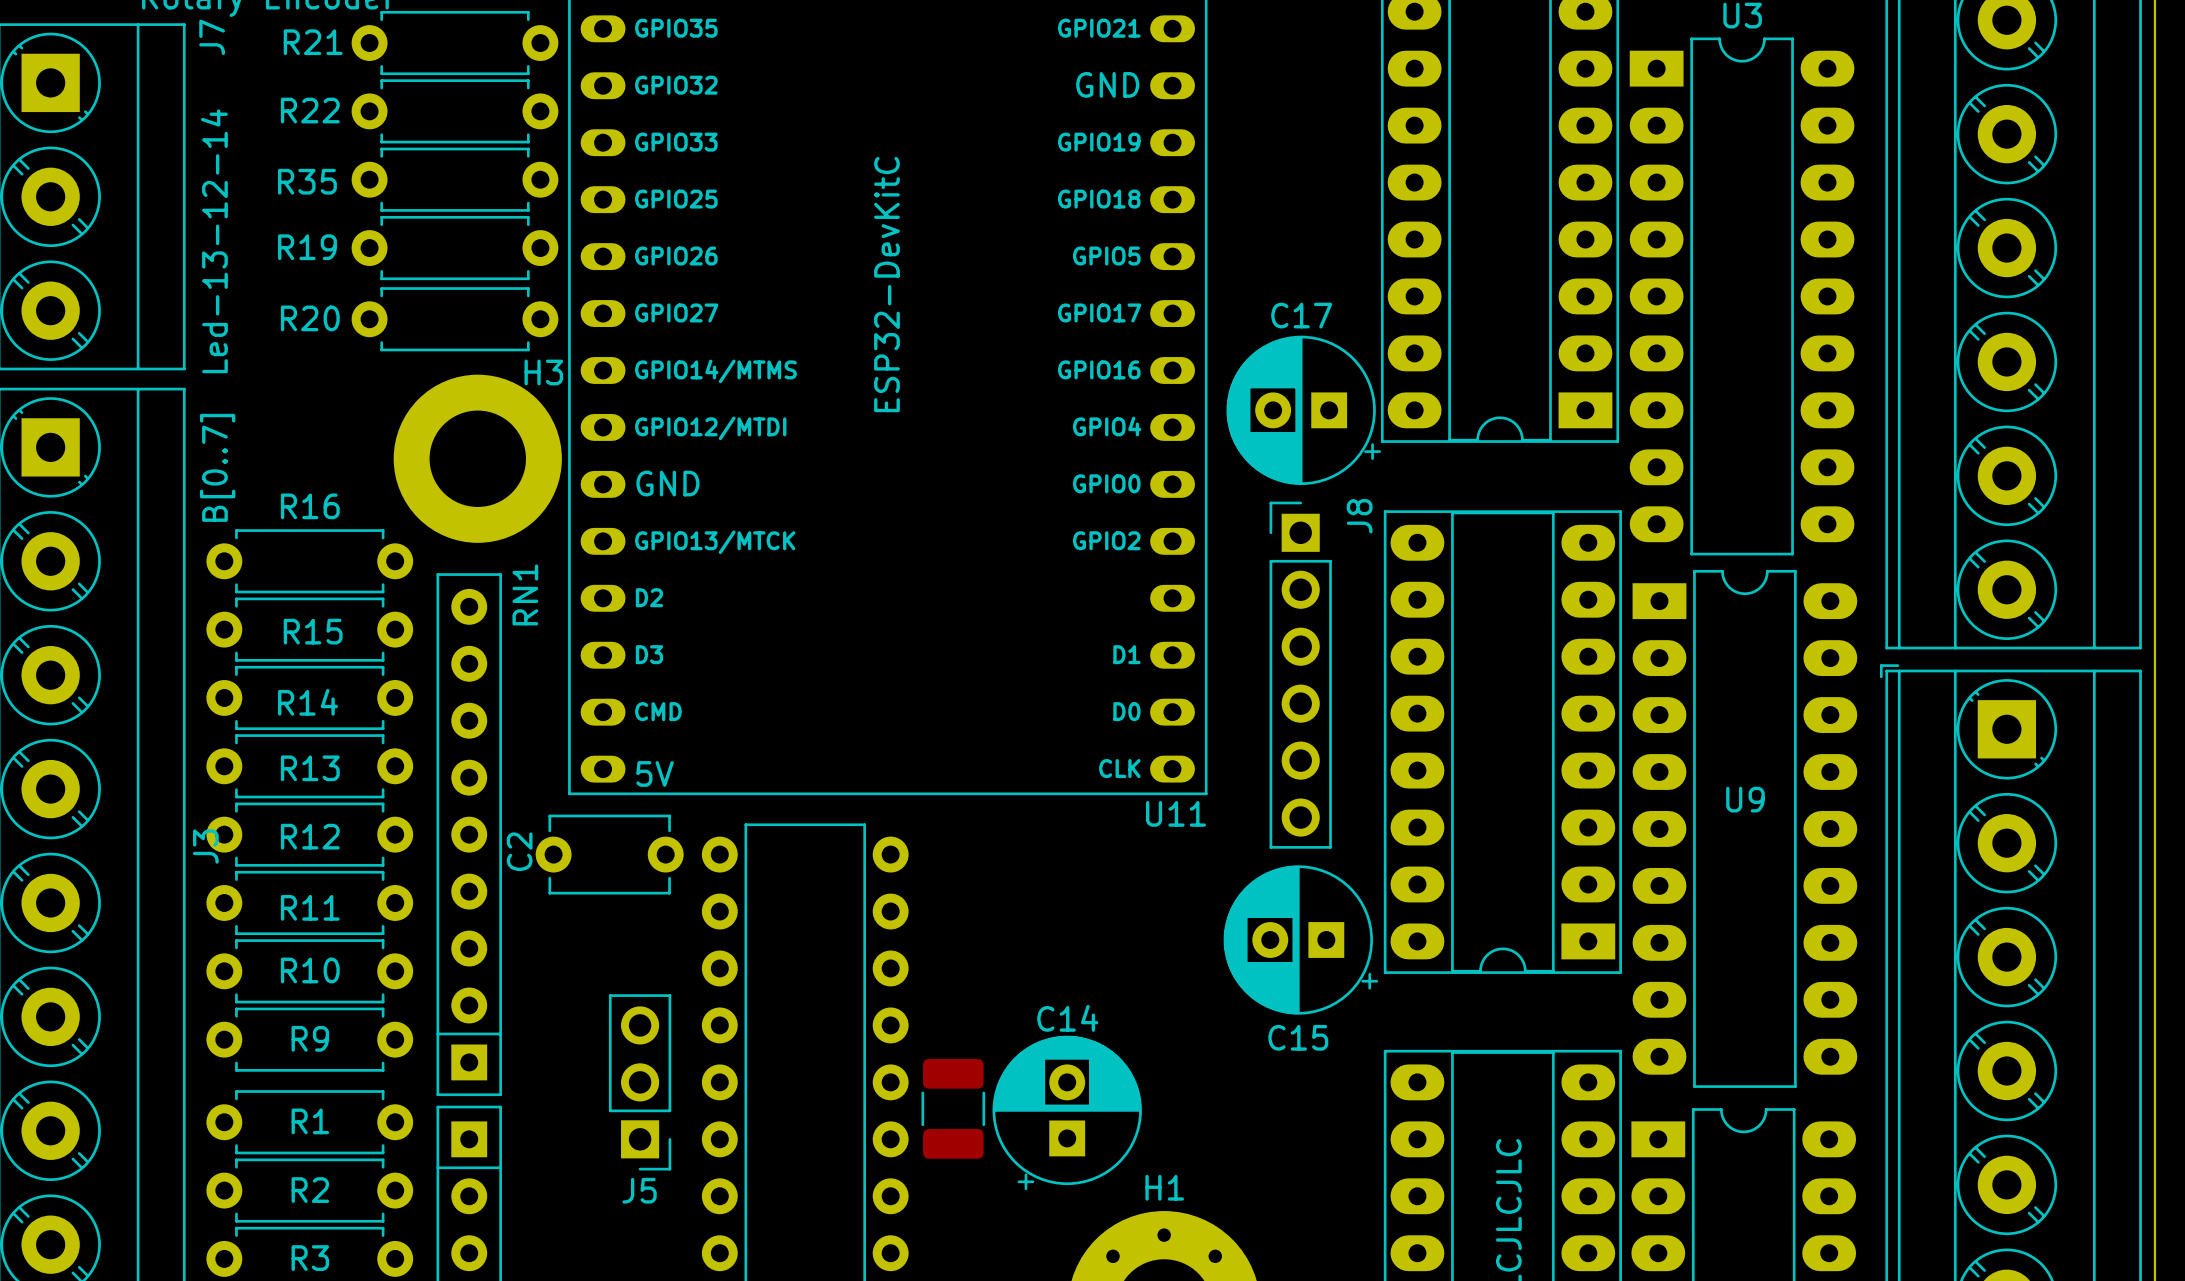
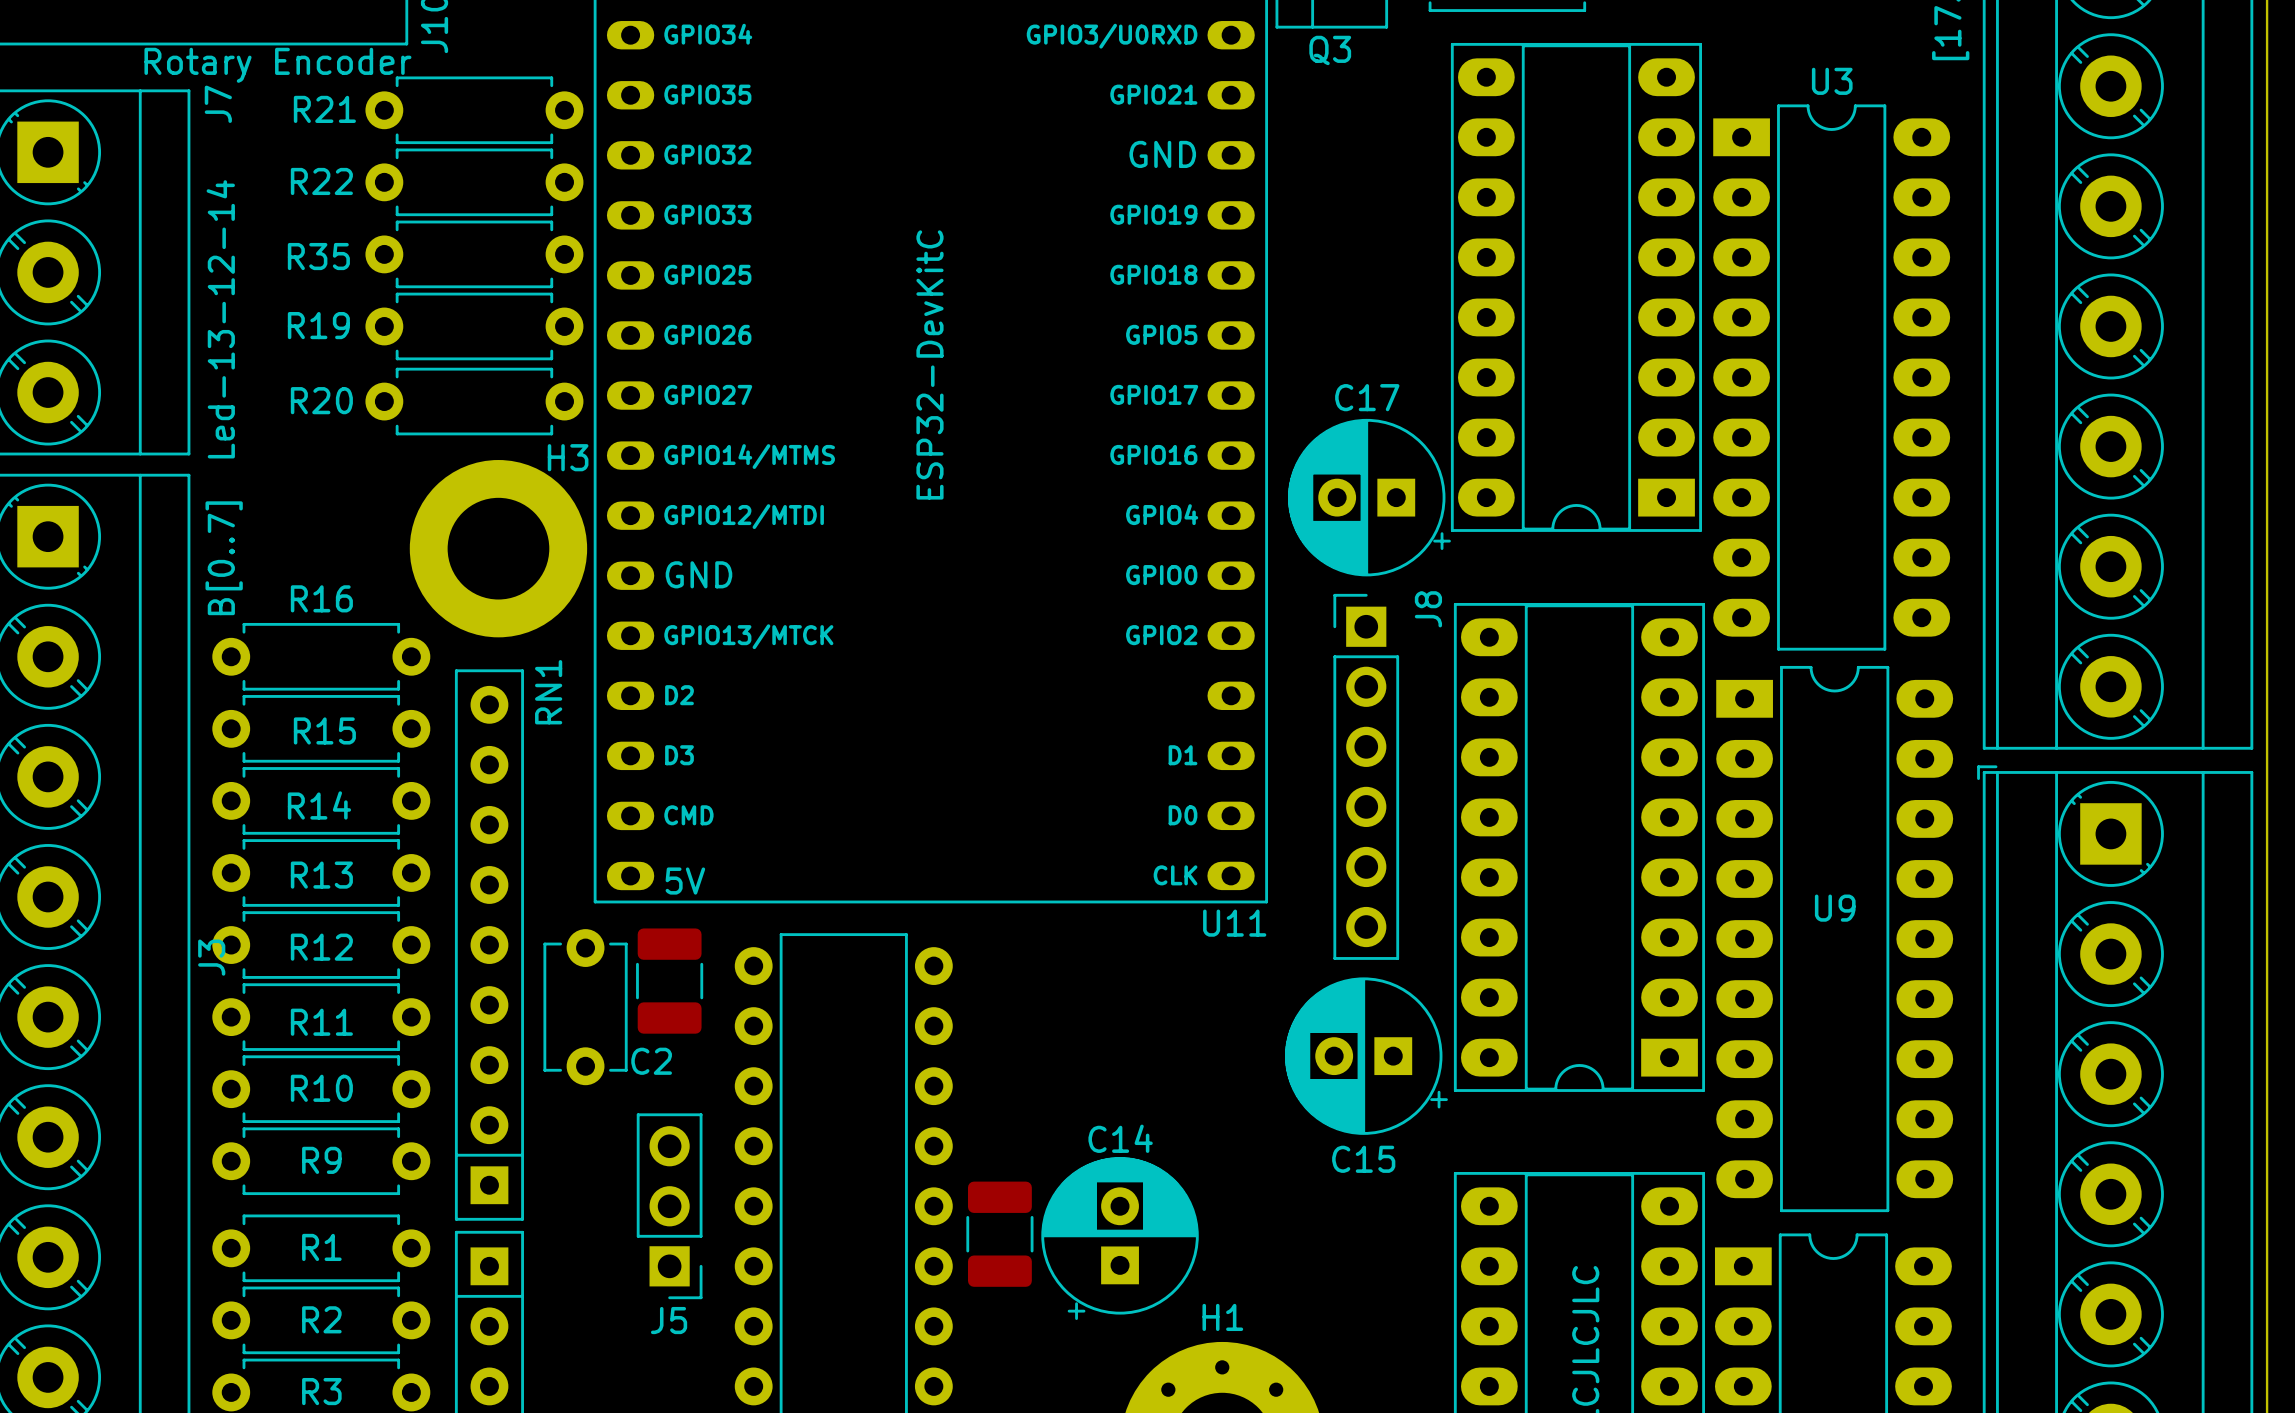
C2 name position: C2 (519, 851) -> C2 (651, 1061)
C2 rotation: 0° (609, 854) -> 90° clockwise (585, 1007)
part: none -> (669, 981)

